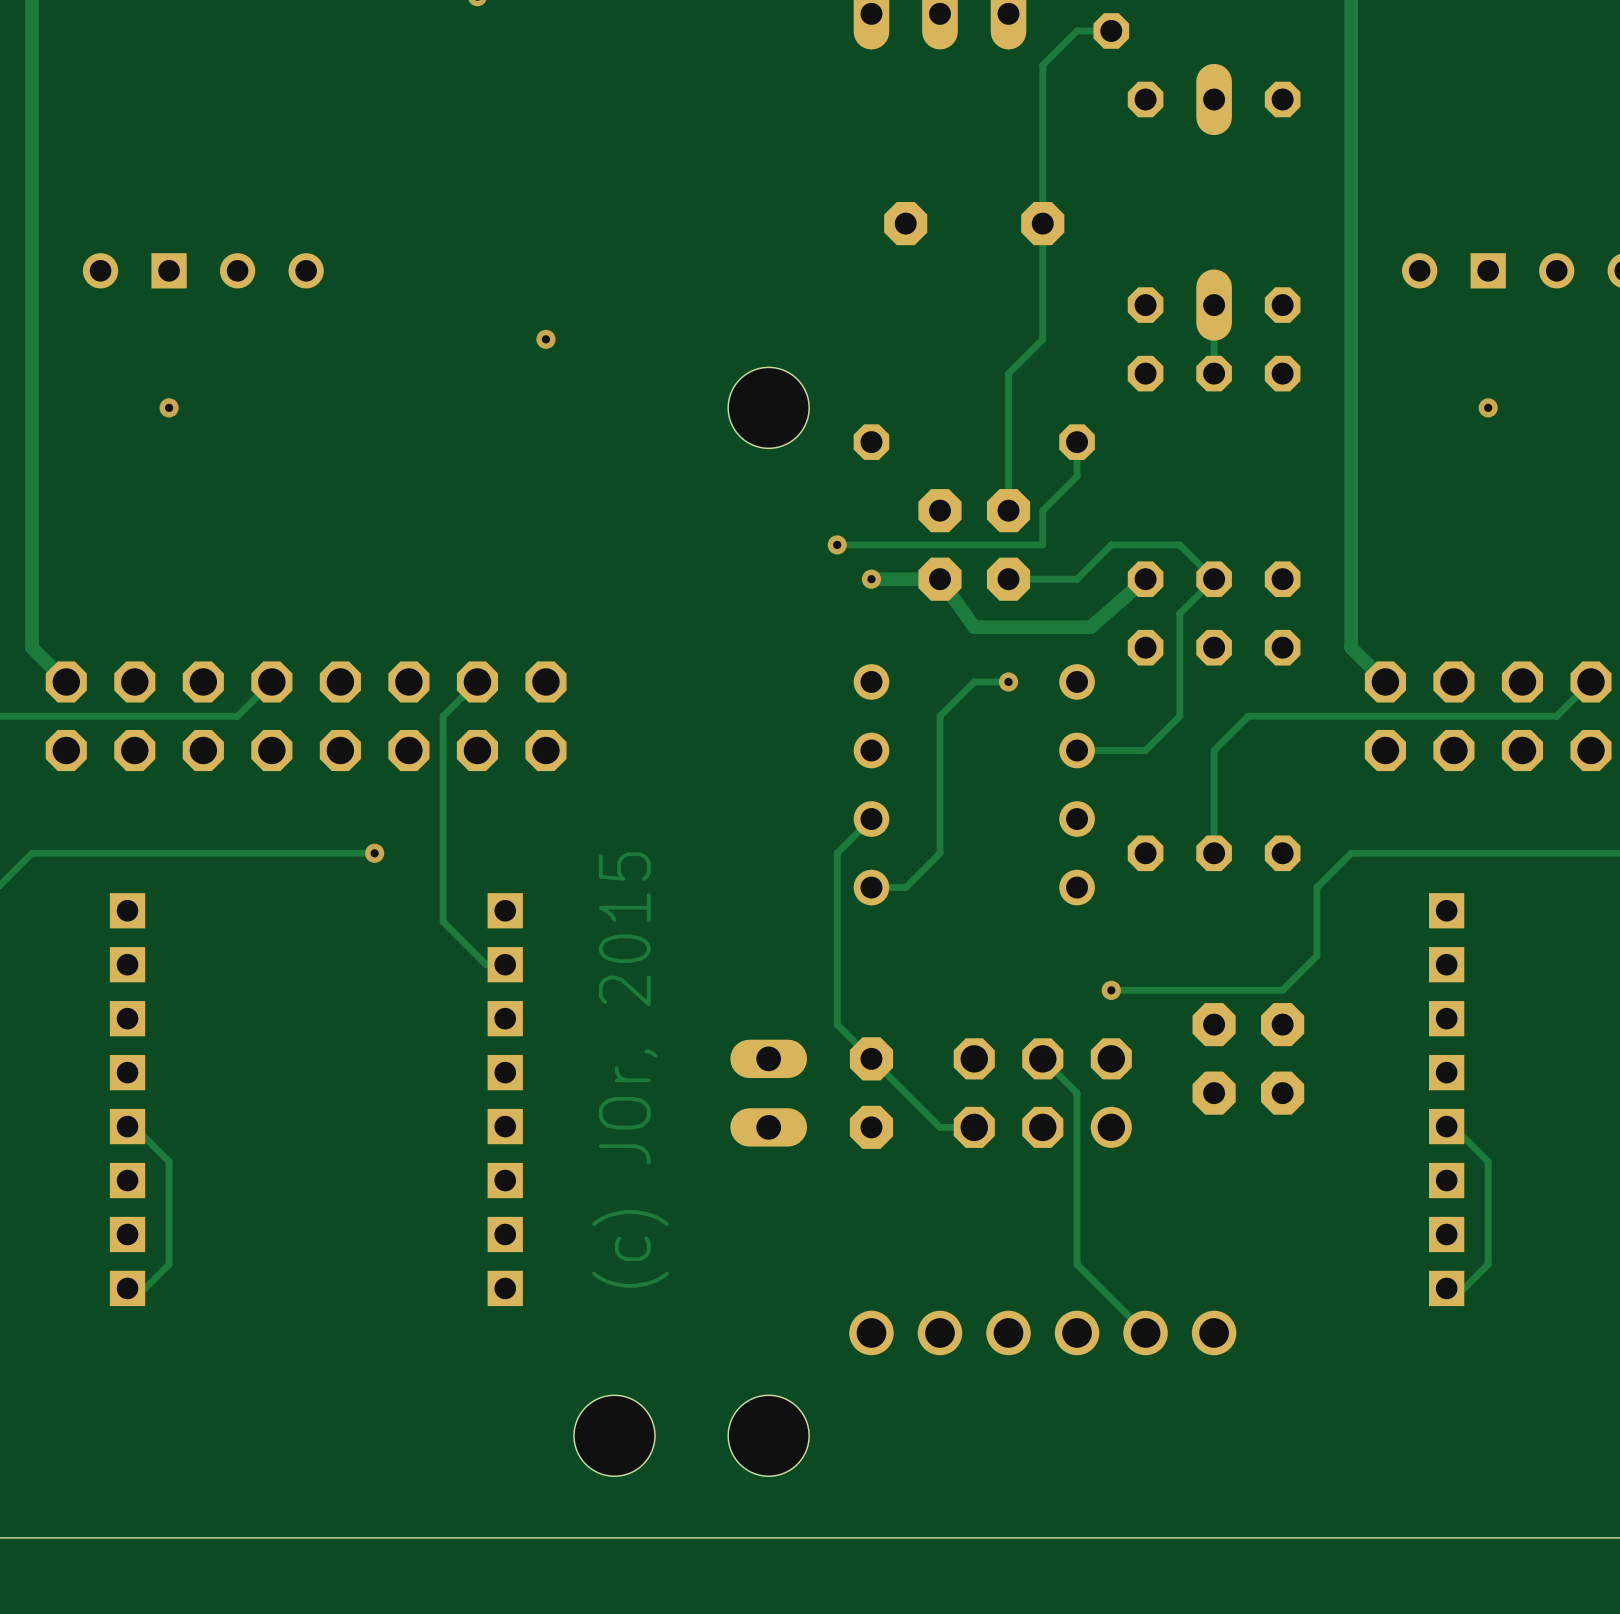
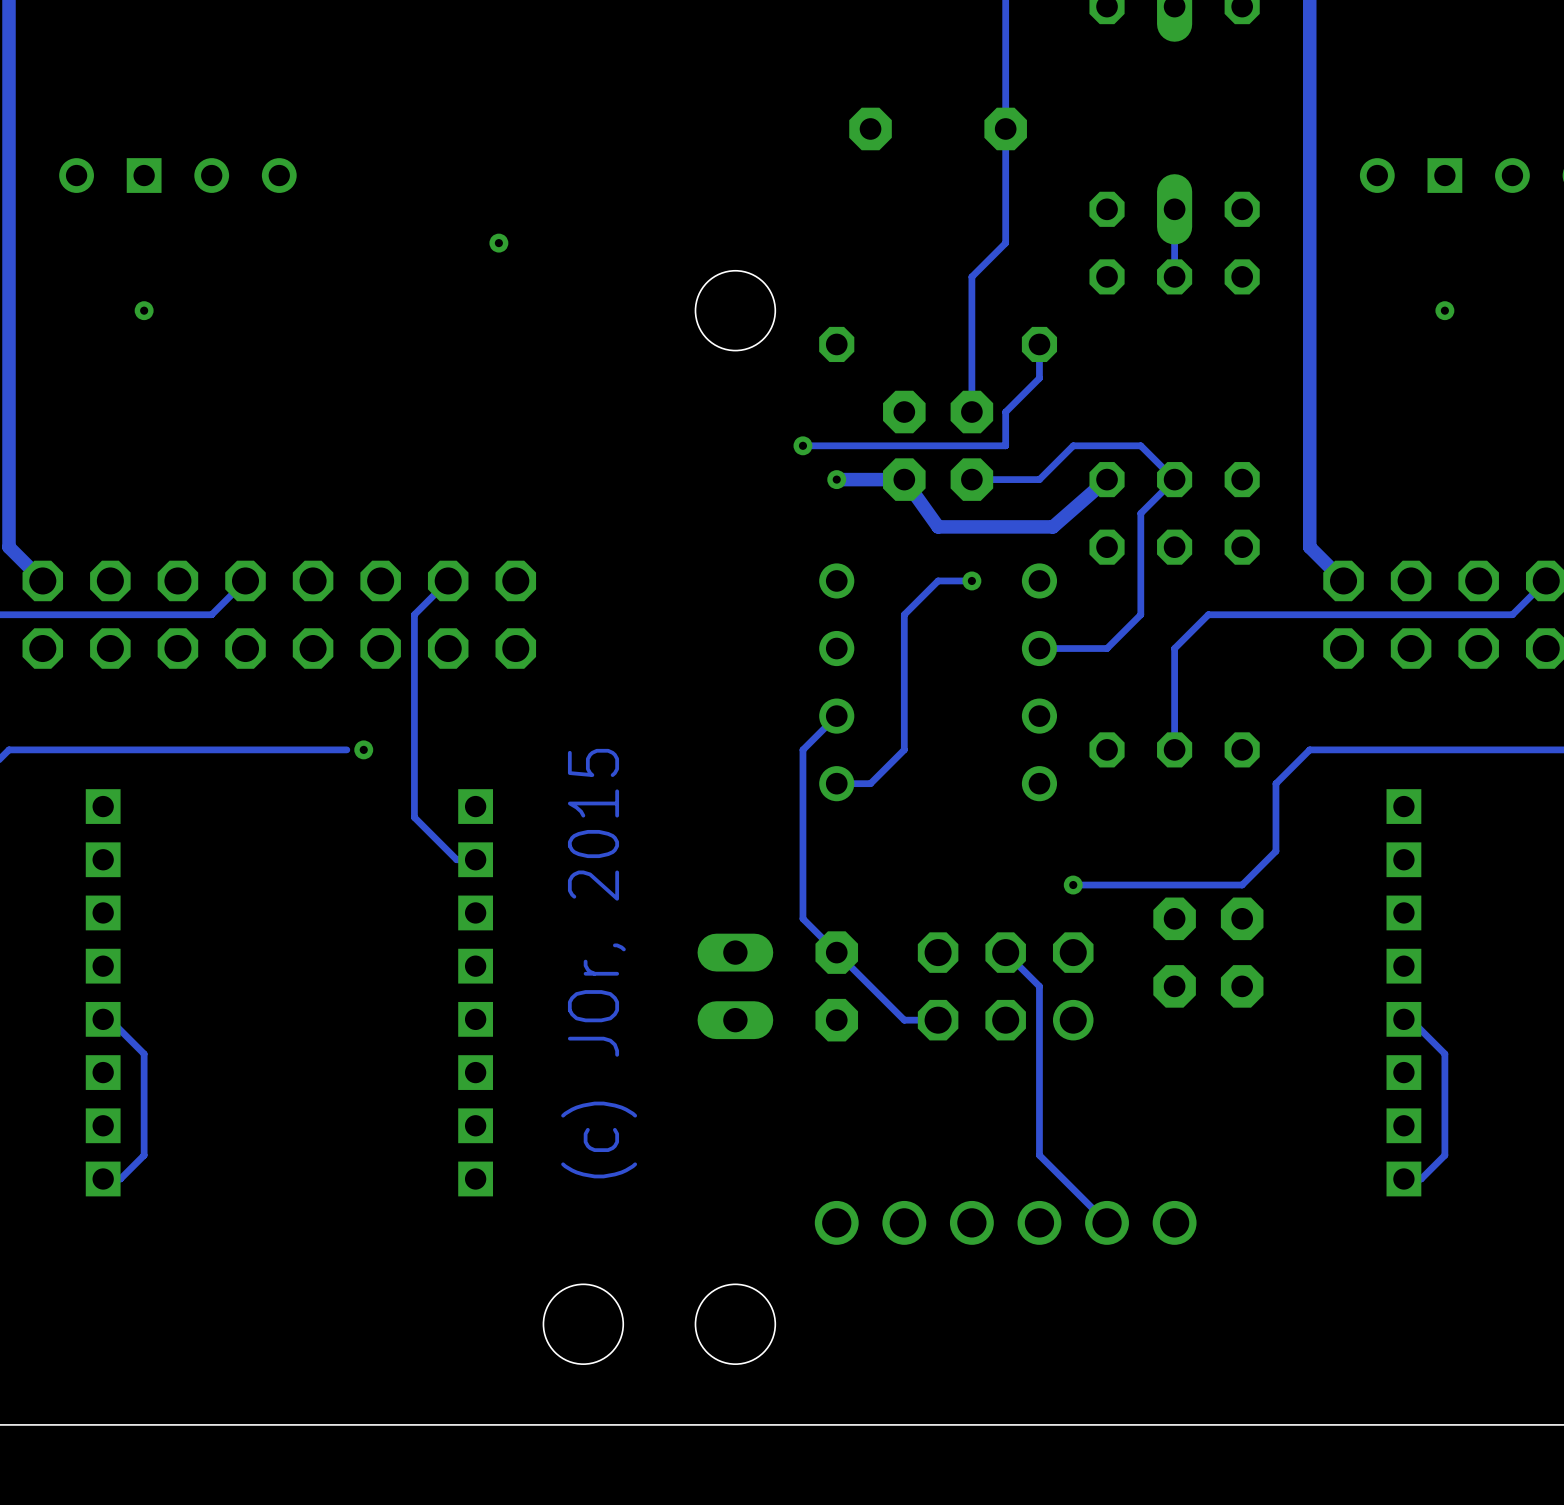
via position: (545, 339) -> (498, 243)
via position: (374, 853) -> (363, 749)

